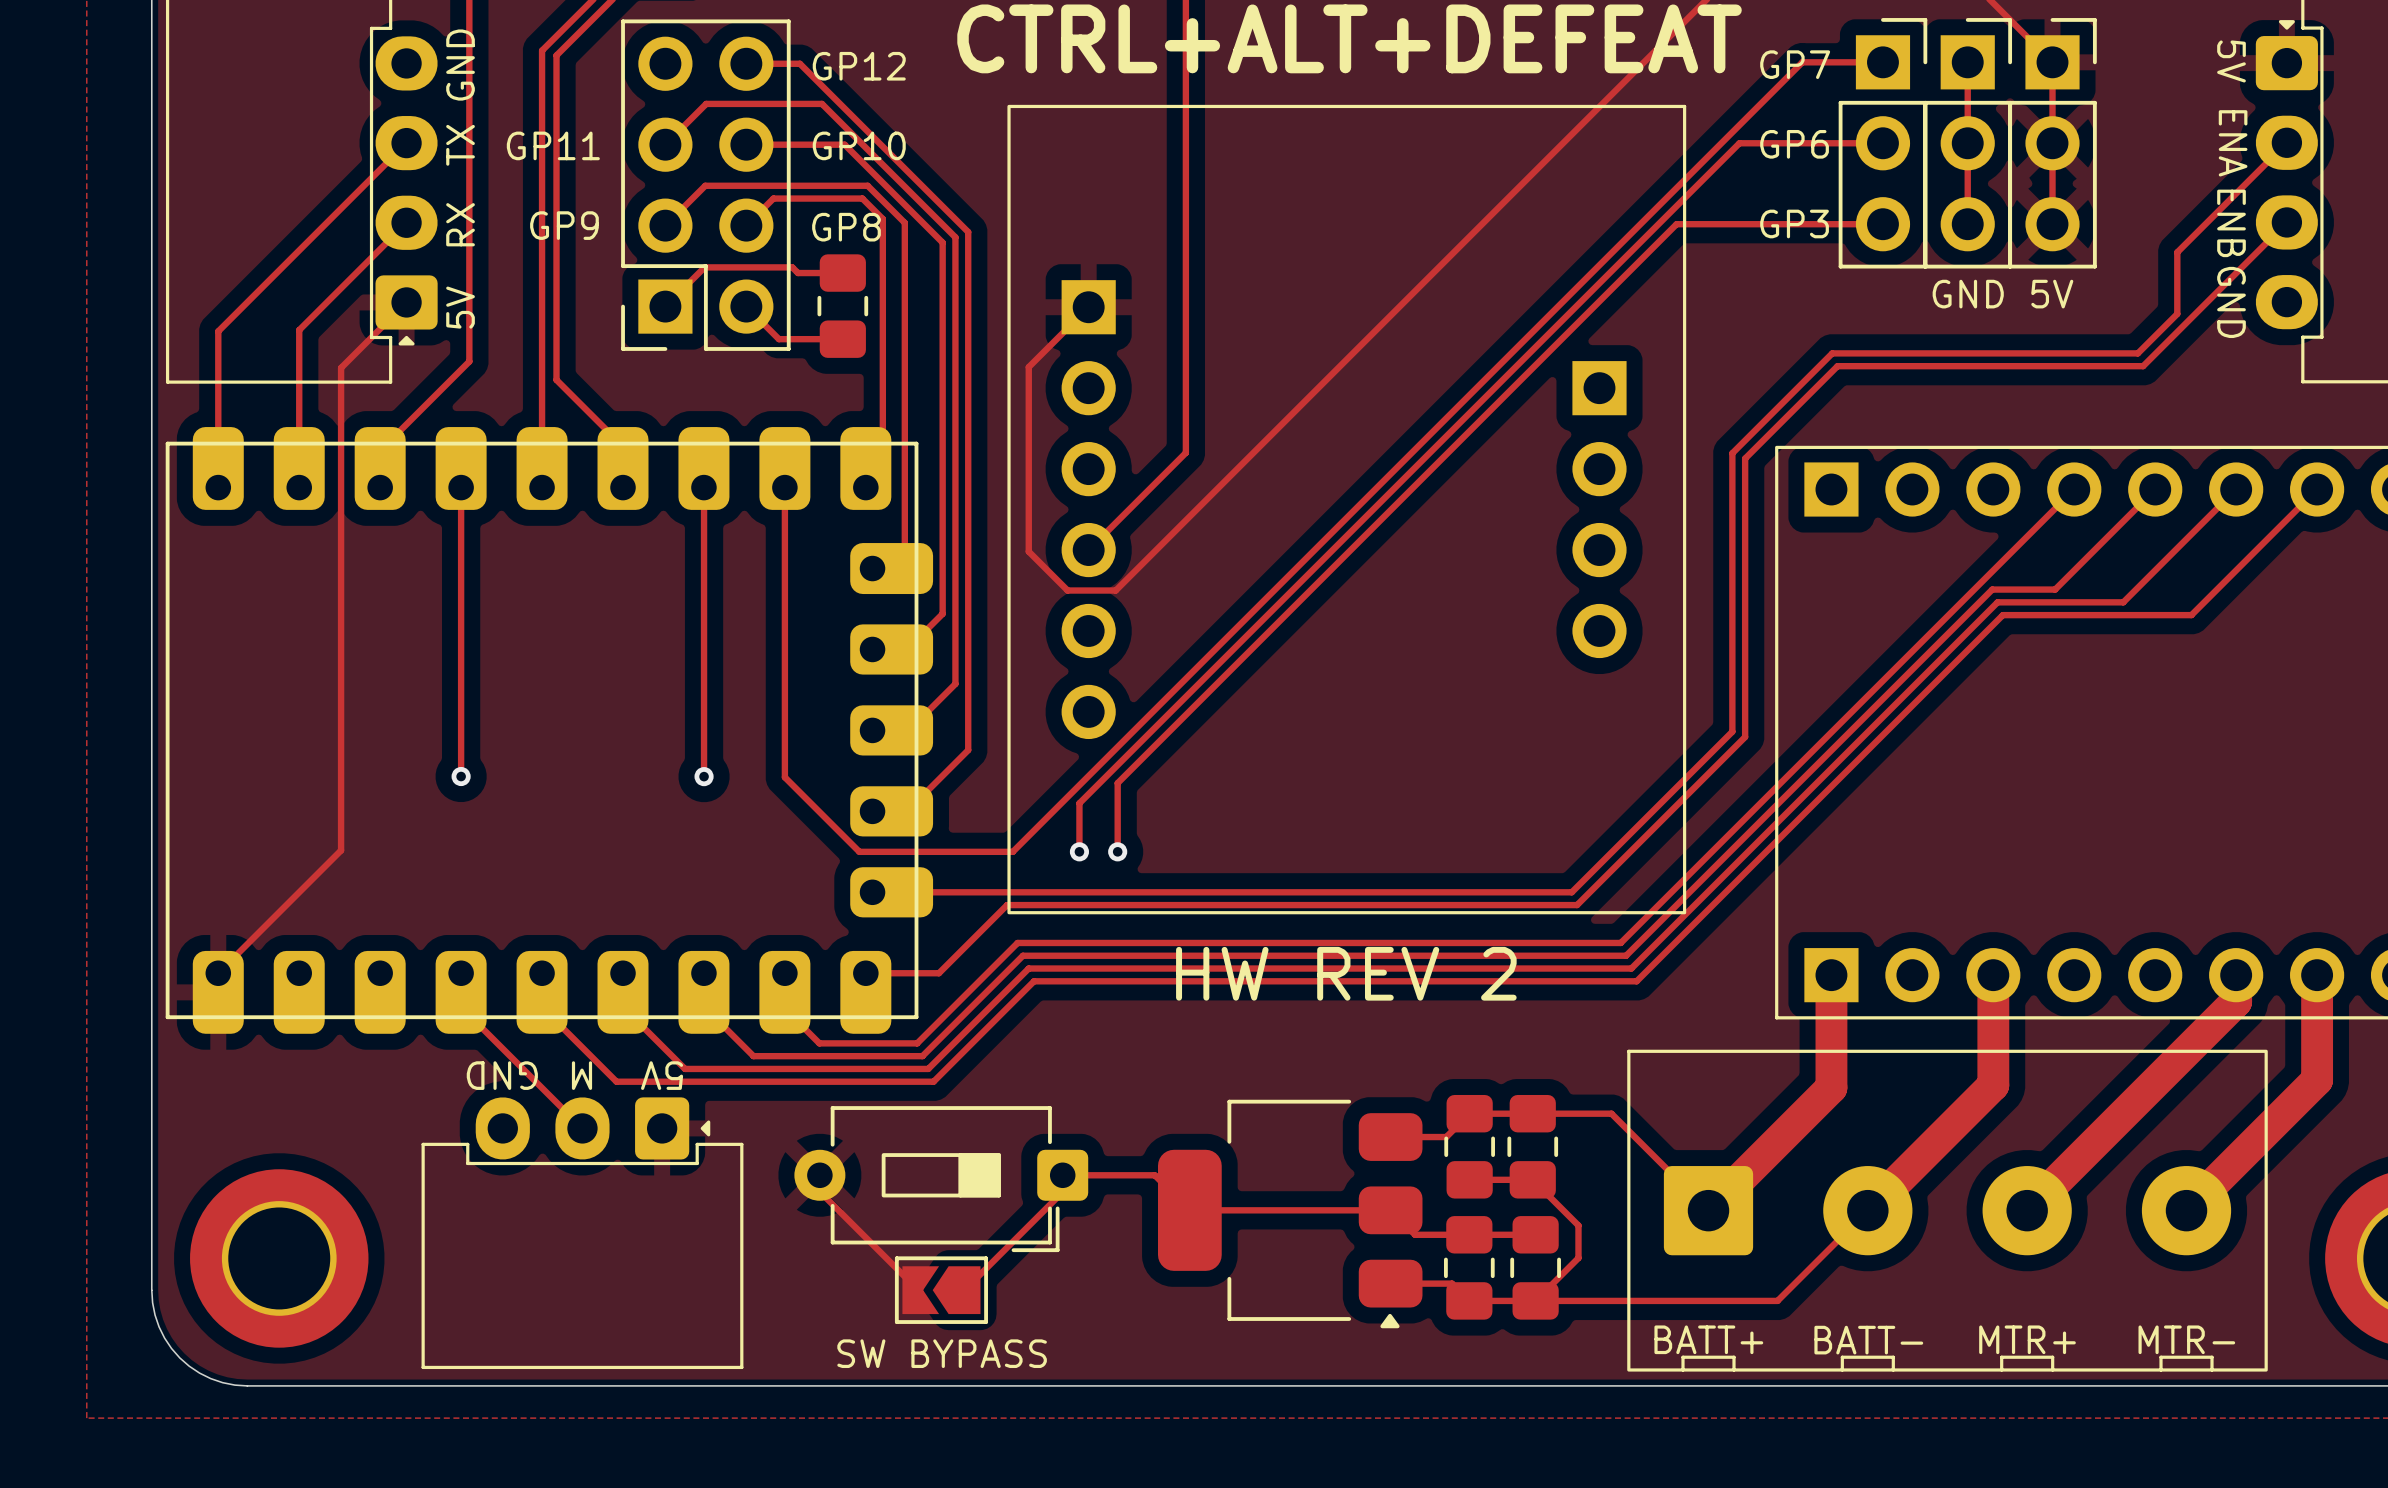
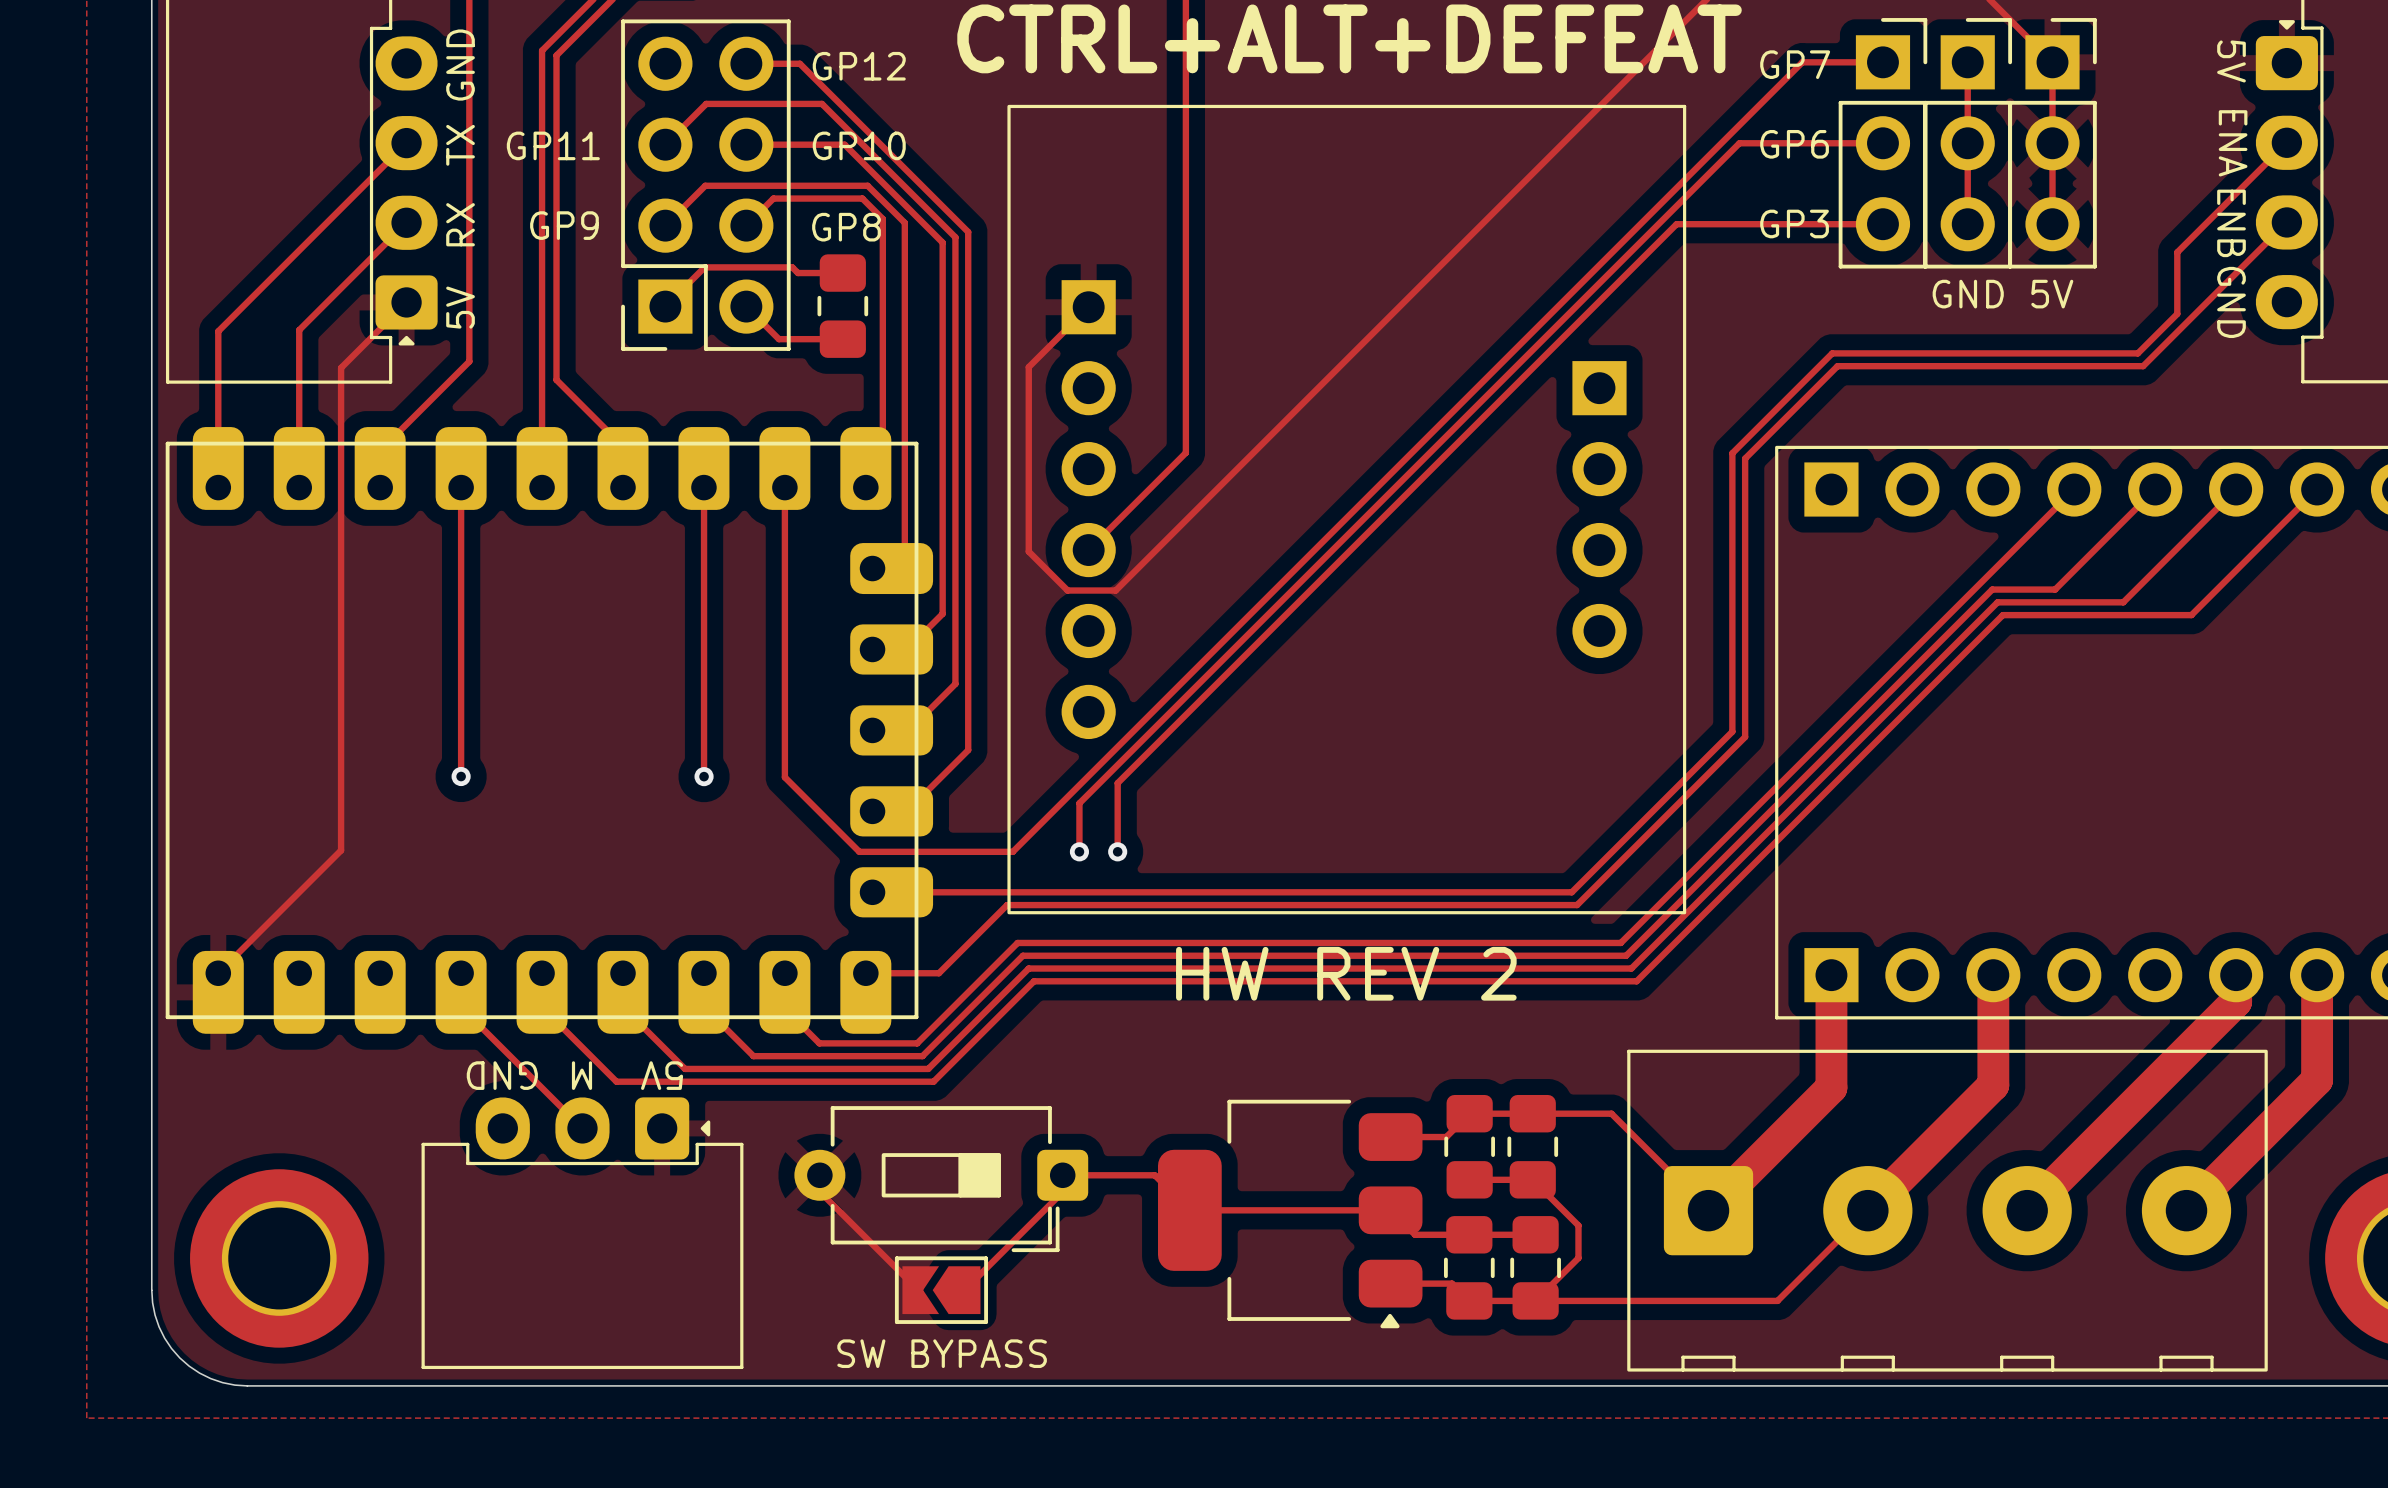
text: BATT+ (1708, 1339) -> none
text: MTR+ (2027, 1339) -> none
text: MTR- (2186, 1339) -> none
text: BATT- (1868, 1340) -> none

